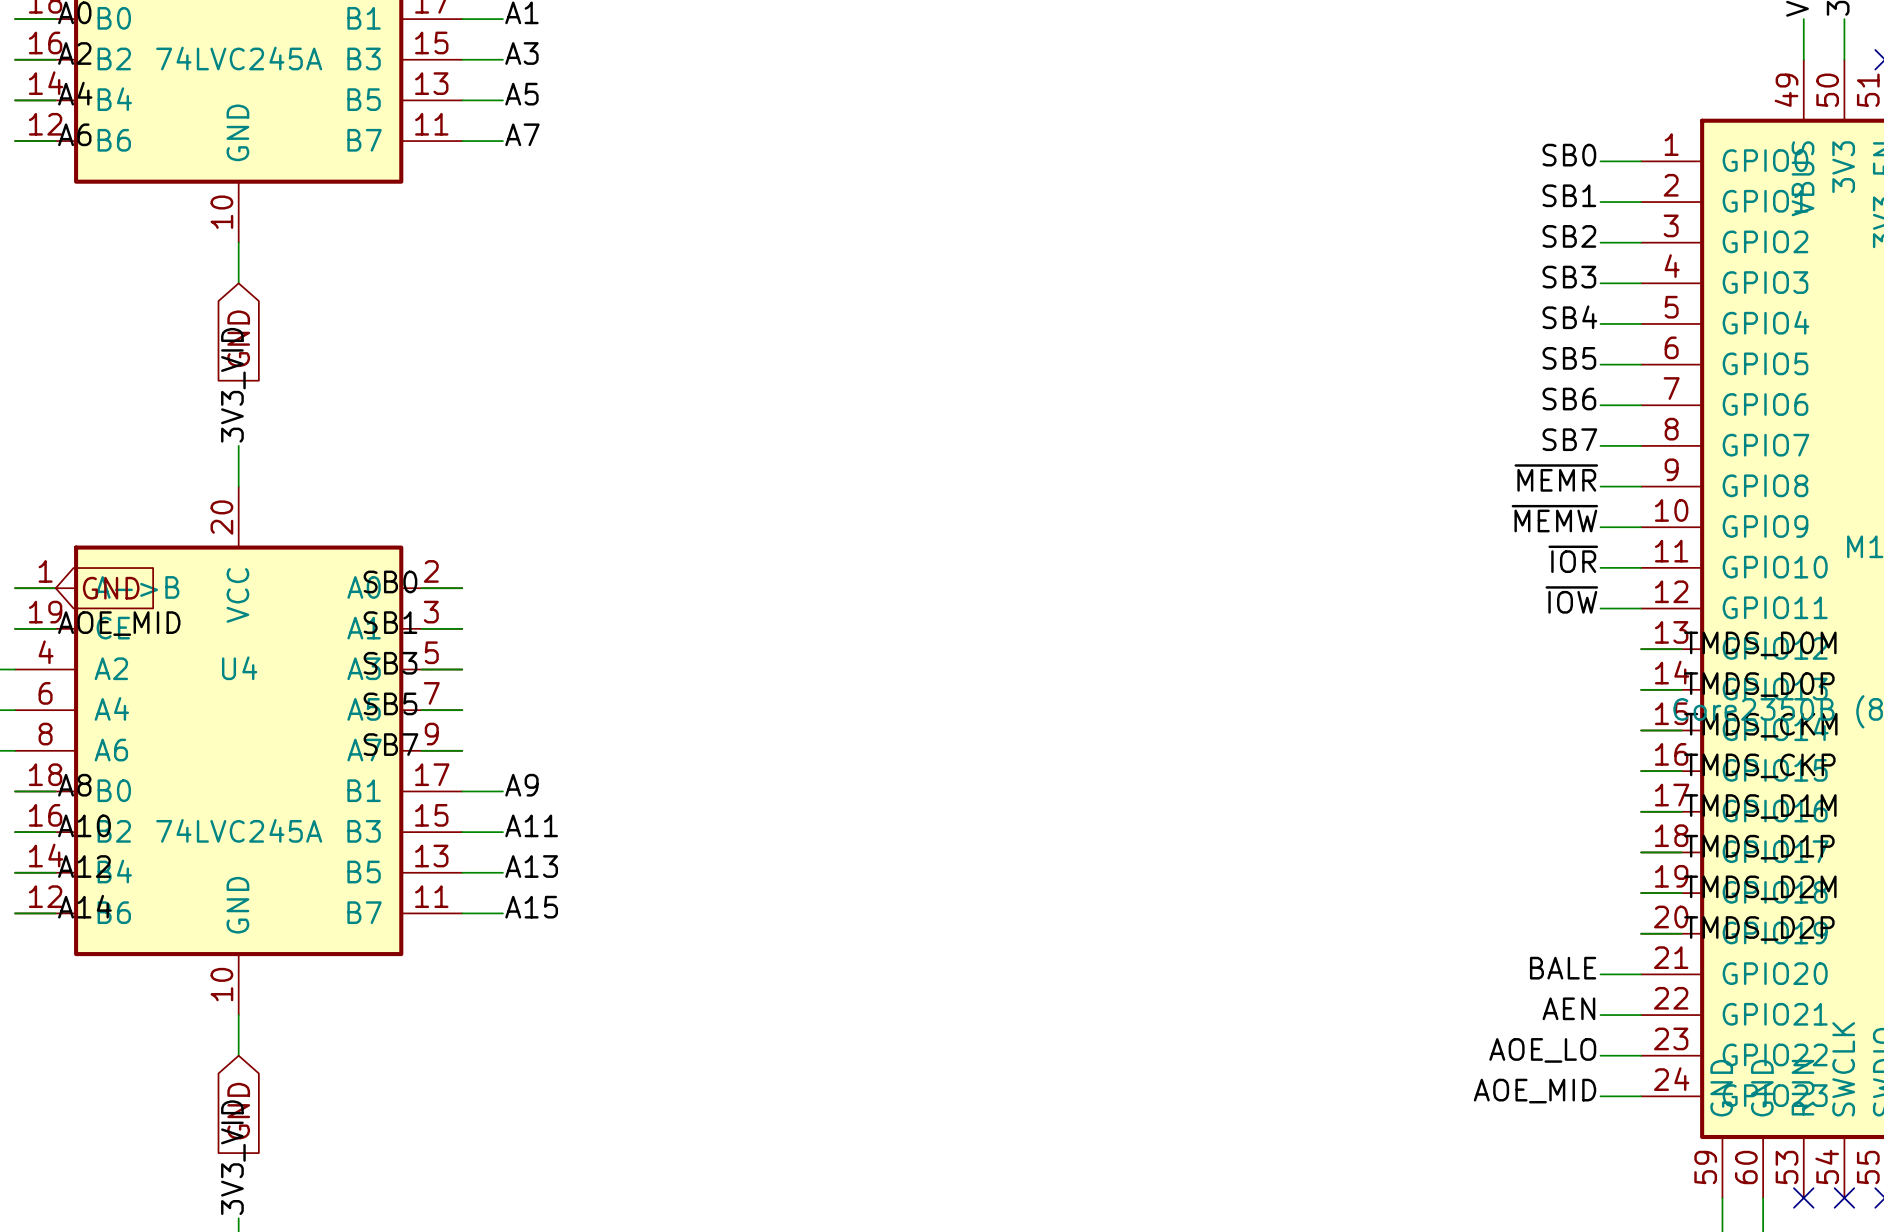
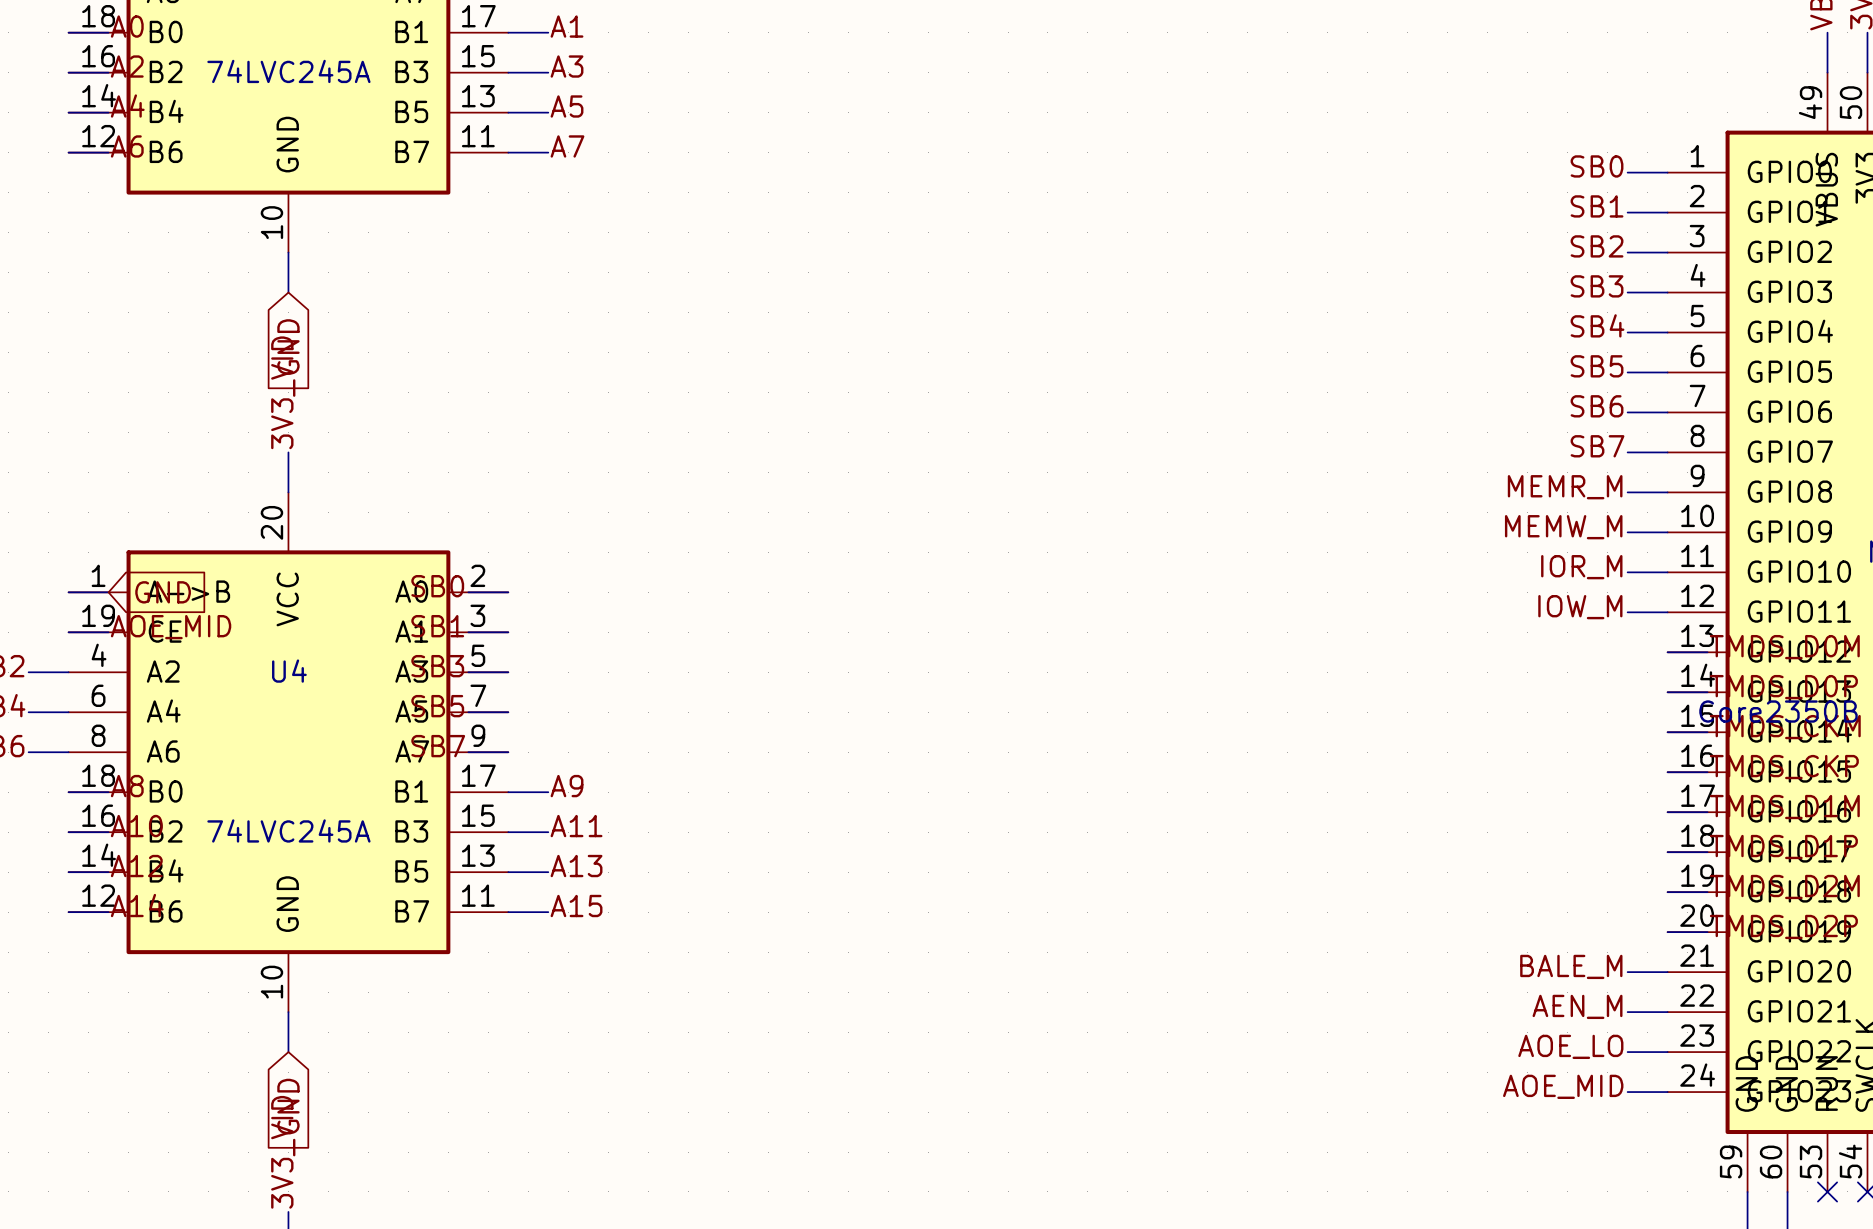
label: ~{MEMR} (1556, 477) -> MEMR_M (1565, 487)
label: ~{MEMW} (1554, 518) -> MEMW_M (1563, 527)
label: ~{IOR} (1573, 559) -> IOR_M (1581, 567)
label: ~{IOW} (1571, 599) -> IOW_M (1580, 607)
label: BALE (1563, 968) -> BALE_M (1571, 966)
label: AEN (1568, 1008) -> AEN_M (1577, 1006)

